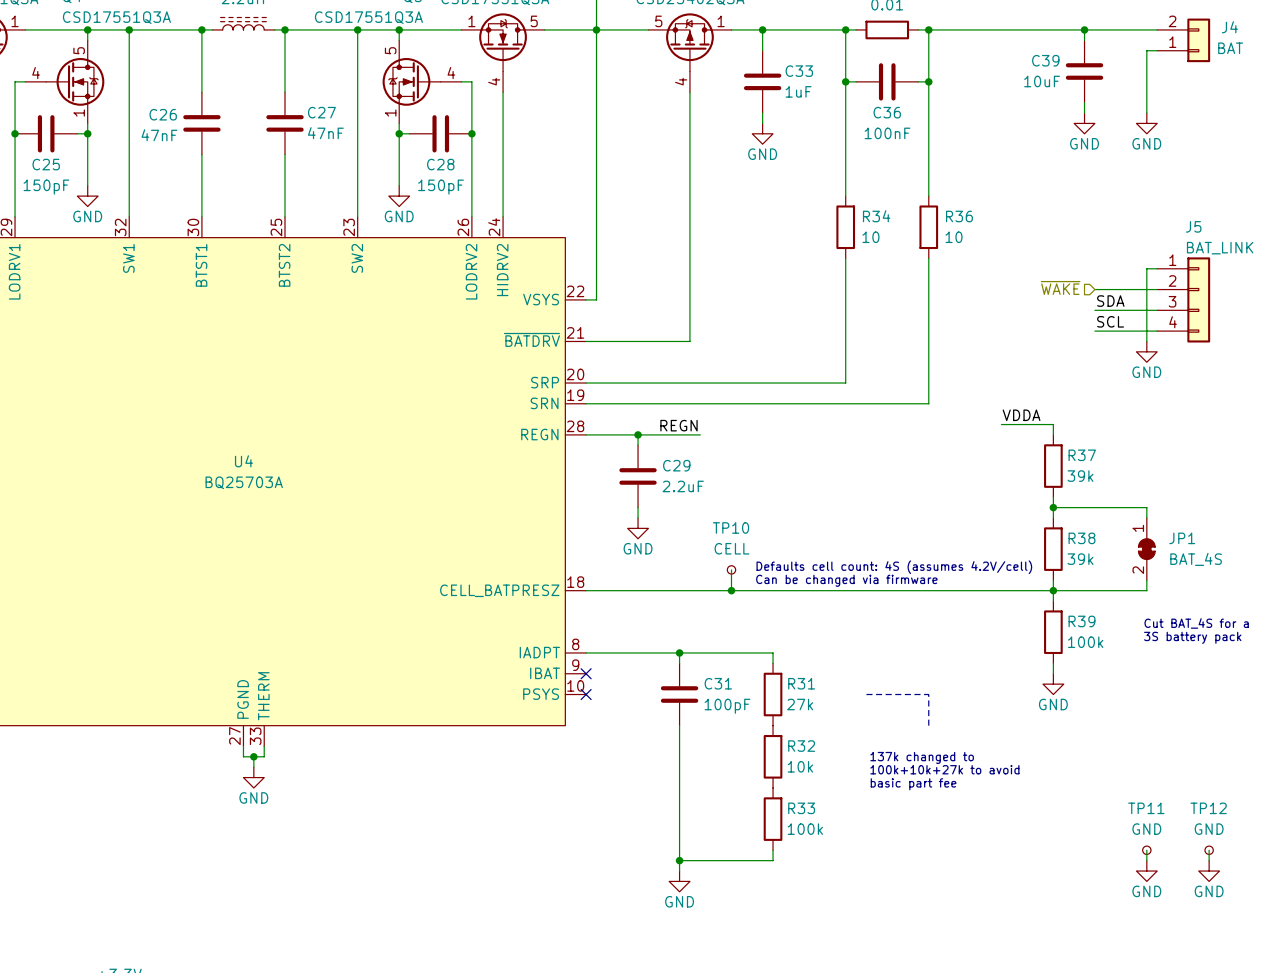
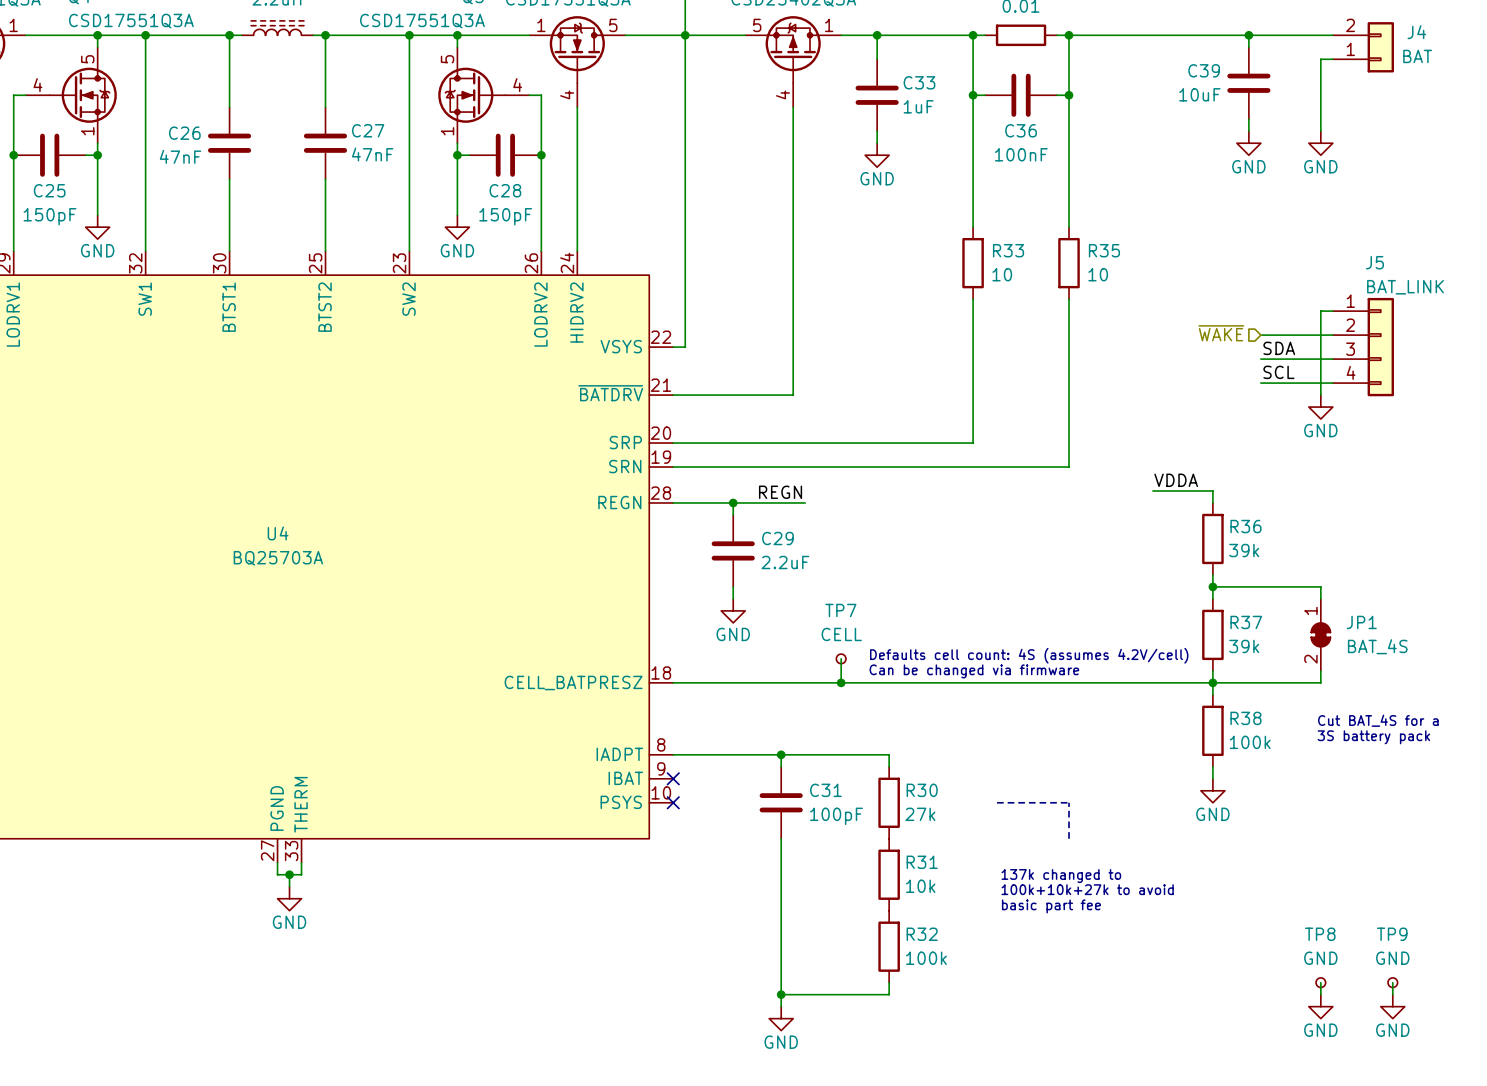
R34 name: R34 (876, 216) -> R33 (1008, 250)
R36 name: R36 (959, 216) -> R35 (1104, 250)
R37 name: R37 (1082, 455) -> R36 (1245, 526)
TP10 name: TP10 (730, 527) -> TP7 (840, 610)
R38 name: R38 (1081, 538) -> R37 (1246, 622)
R39 name: R39 (1081, 621) -> R38 (1245, 718)
R31 name: R31 (801, 683) -> R30 (922, 790)
R32 name: R32 (801, 746) -> R31 (922, 862)
R33 name: R33 (801, 808) -> R32 (922, 934)
TP11 name: TP11 (1146, 808) -> TP8 (1320, 934)
TP12 name: TP12 (1208, 808) -> TP9 (1392, 934)

